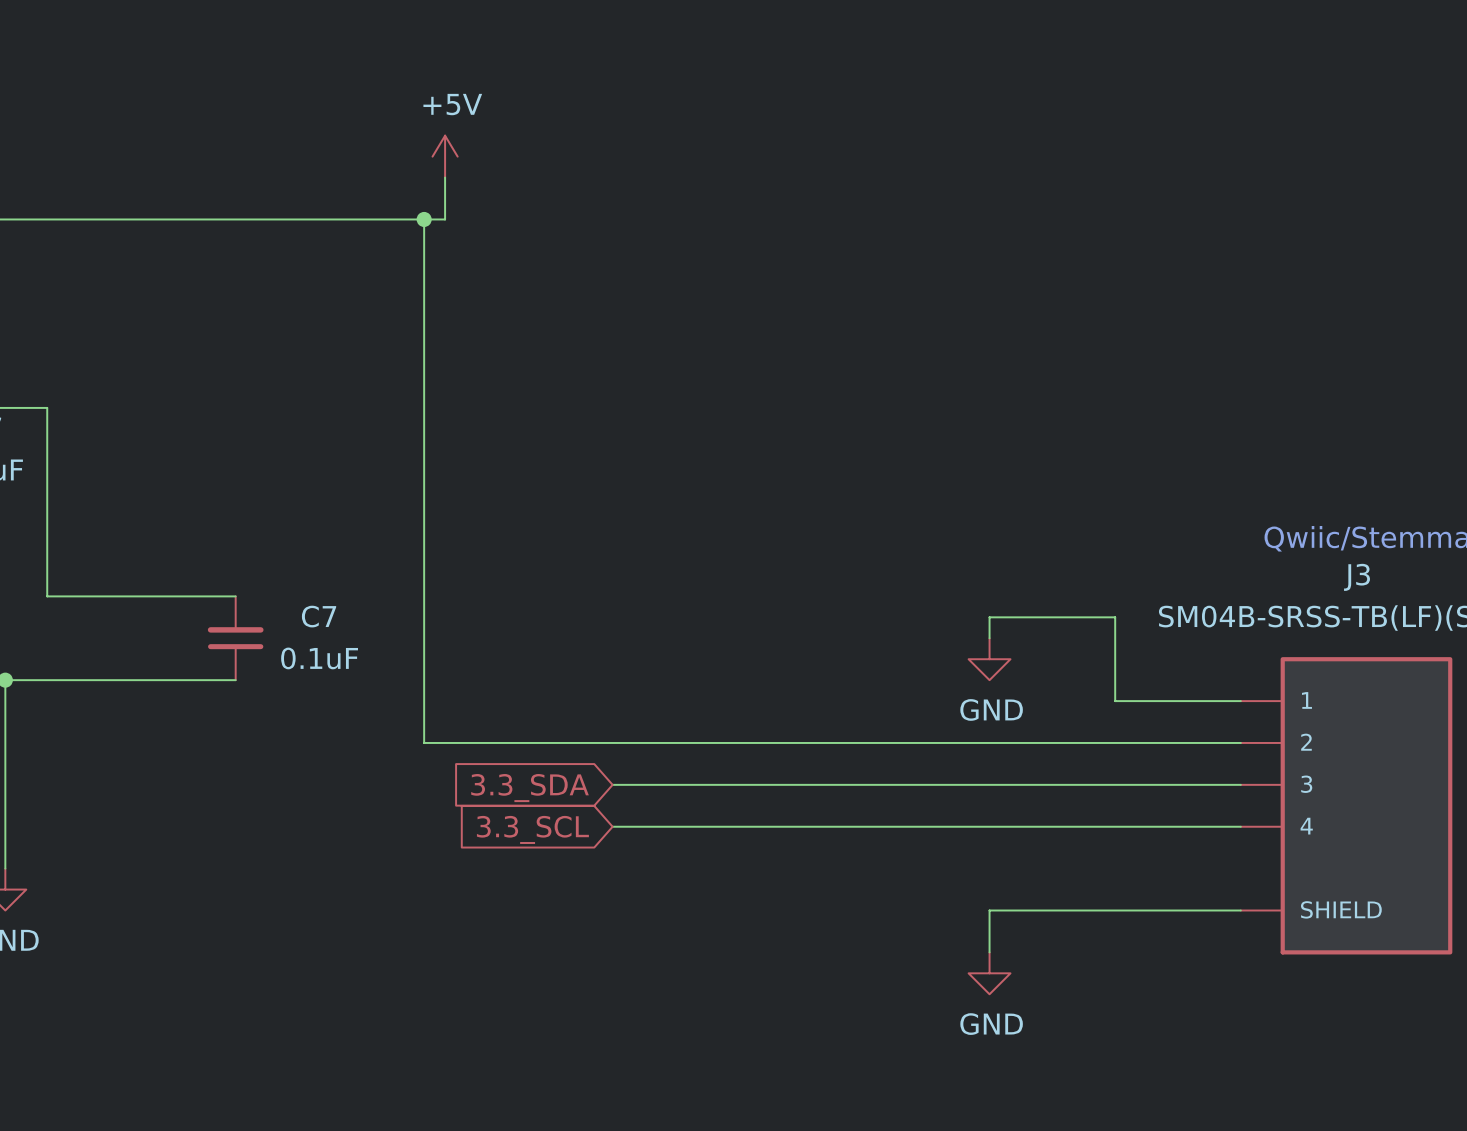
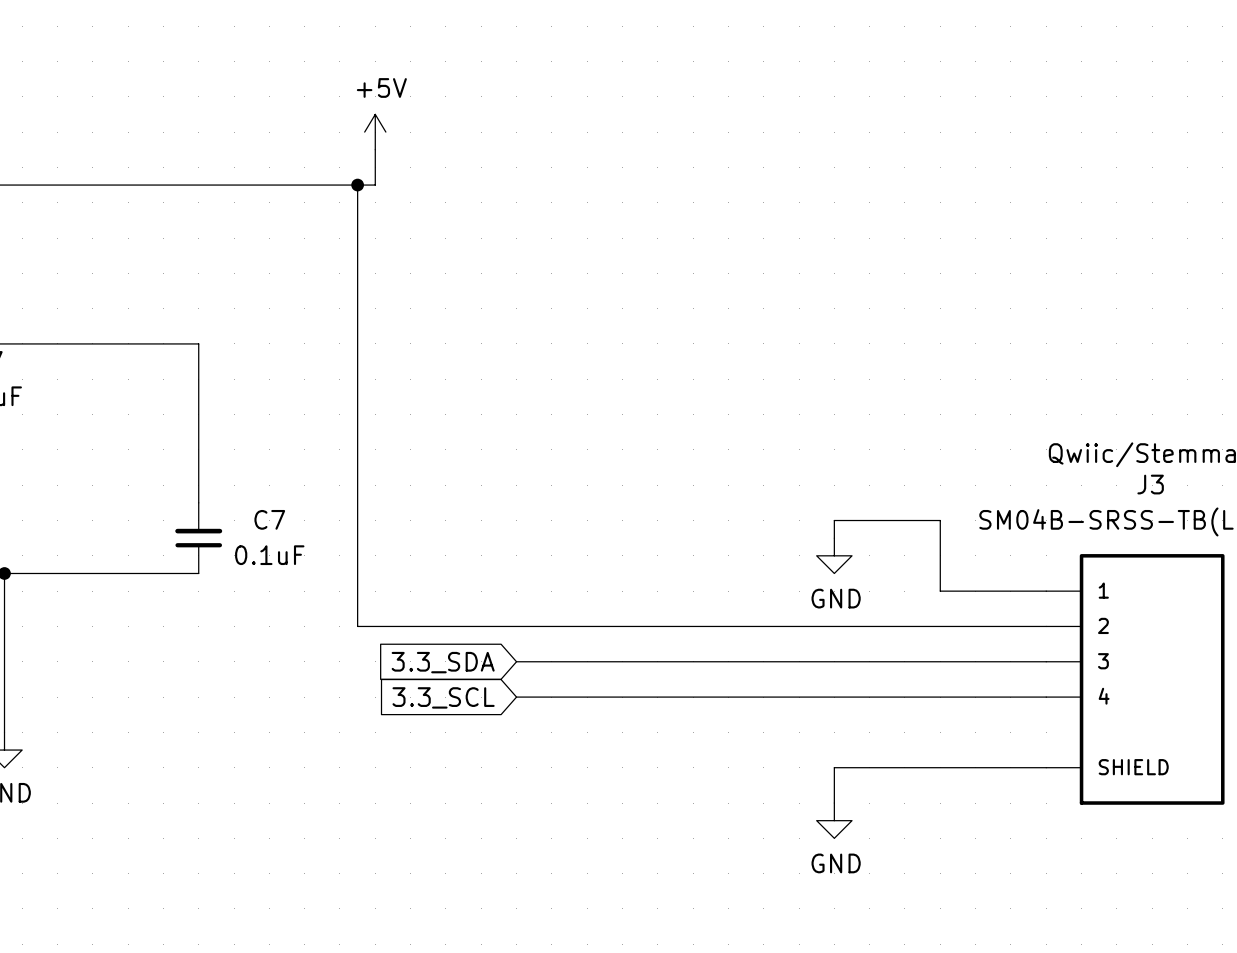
wire: (47, 407) (47, 596) (235, 596) -> (39, 343) (198, 343) (198, 502)

